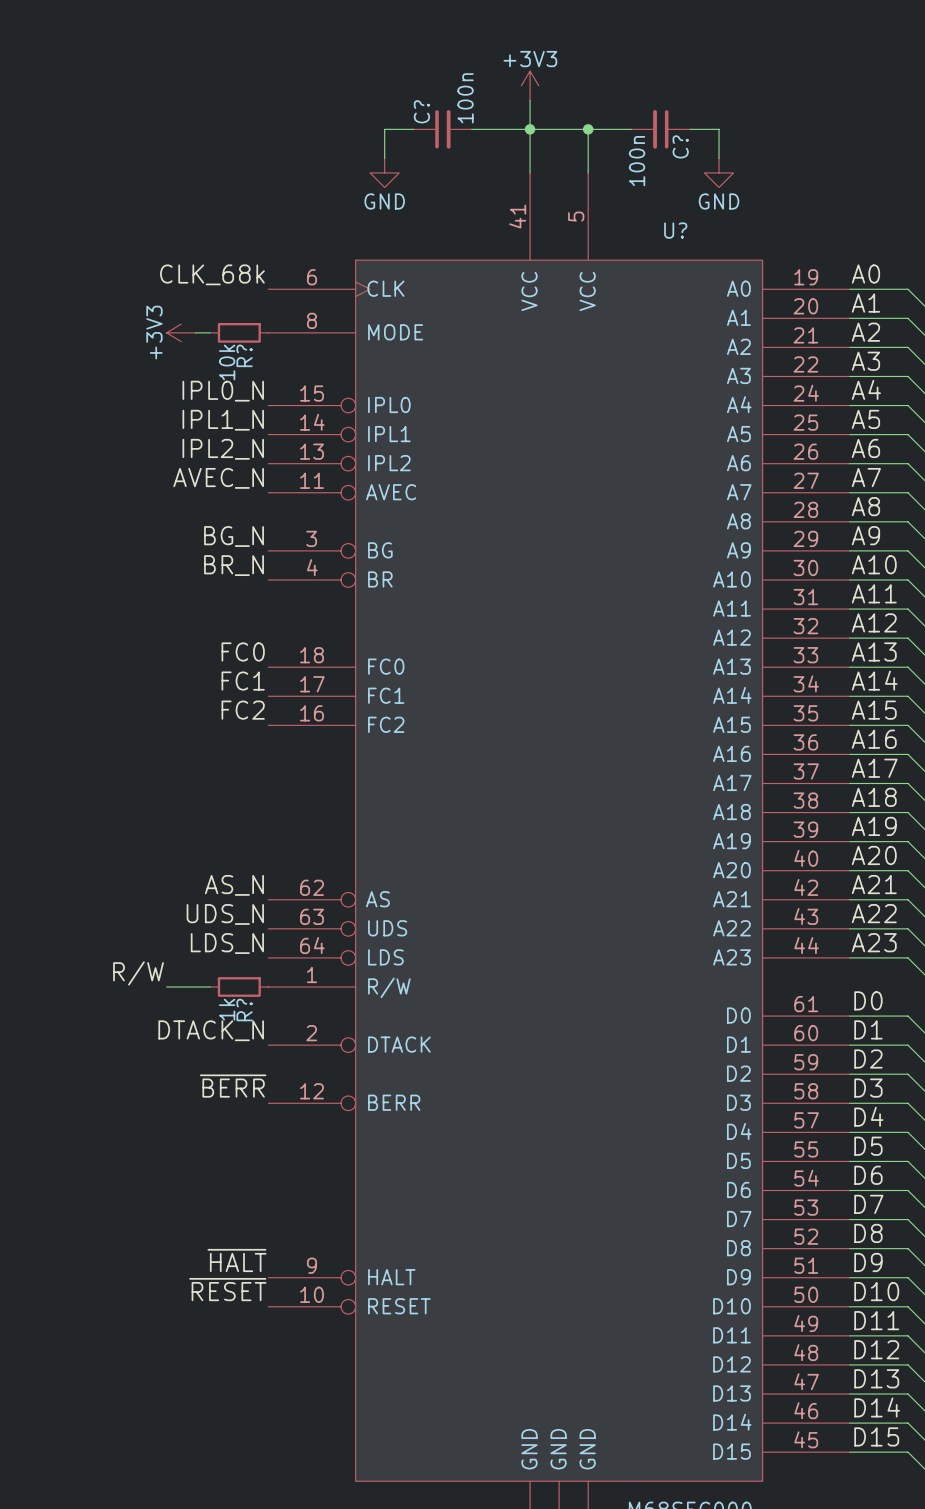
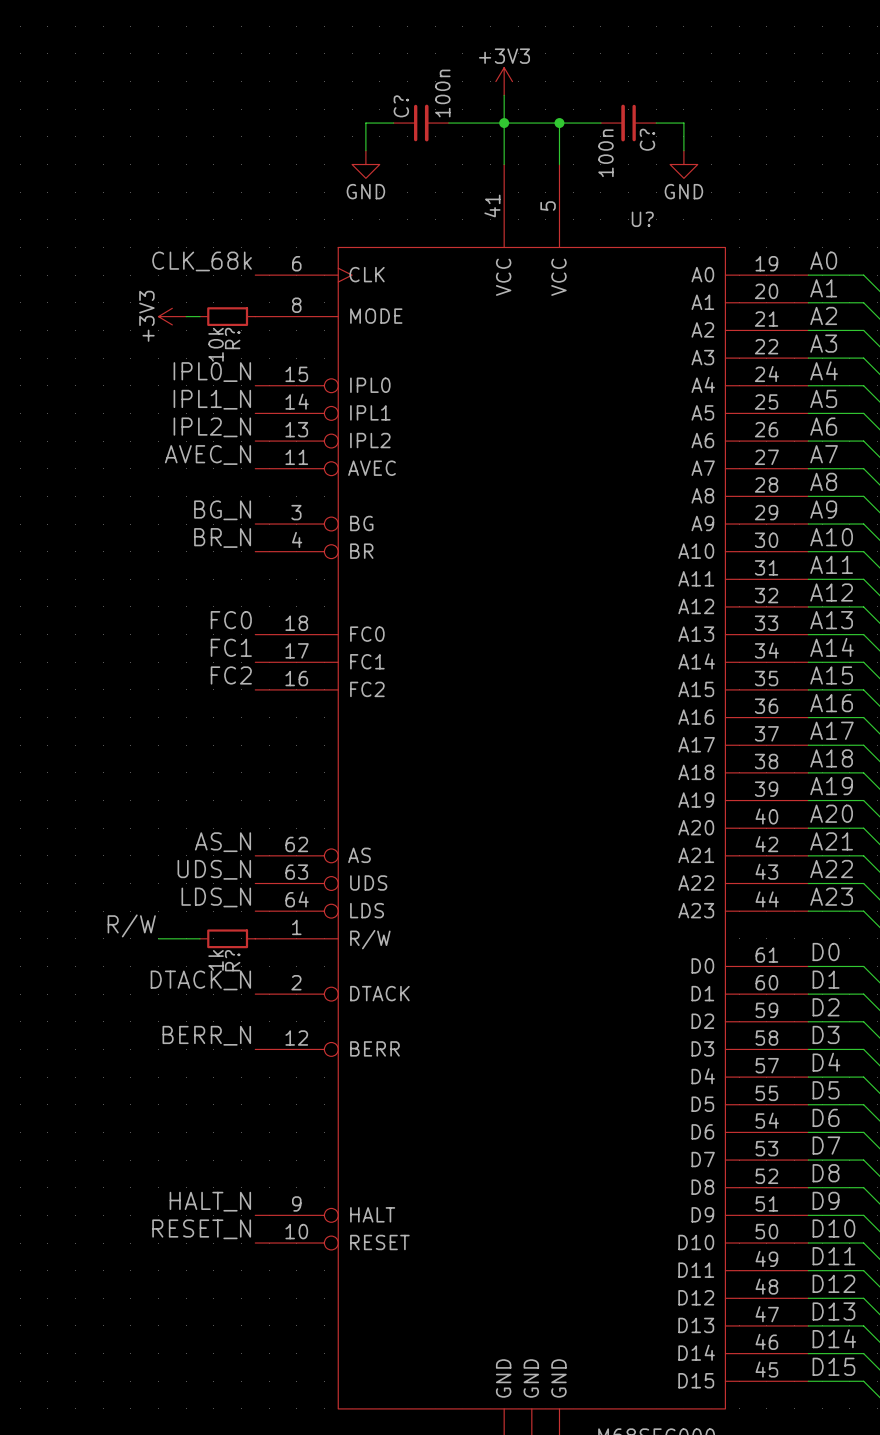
label: ~{BERR} (233, 1086) -> BERR_N (206, 1035)
label: ~{HALT} (236, 1260) -> HALT_N (210, 1201)
label: ~{RESET} (227, 1289) -> RESET_N (201, 1229)

